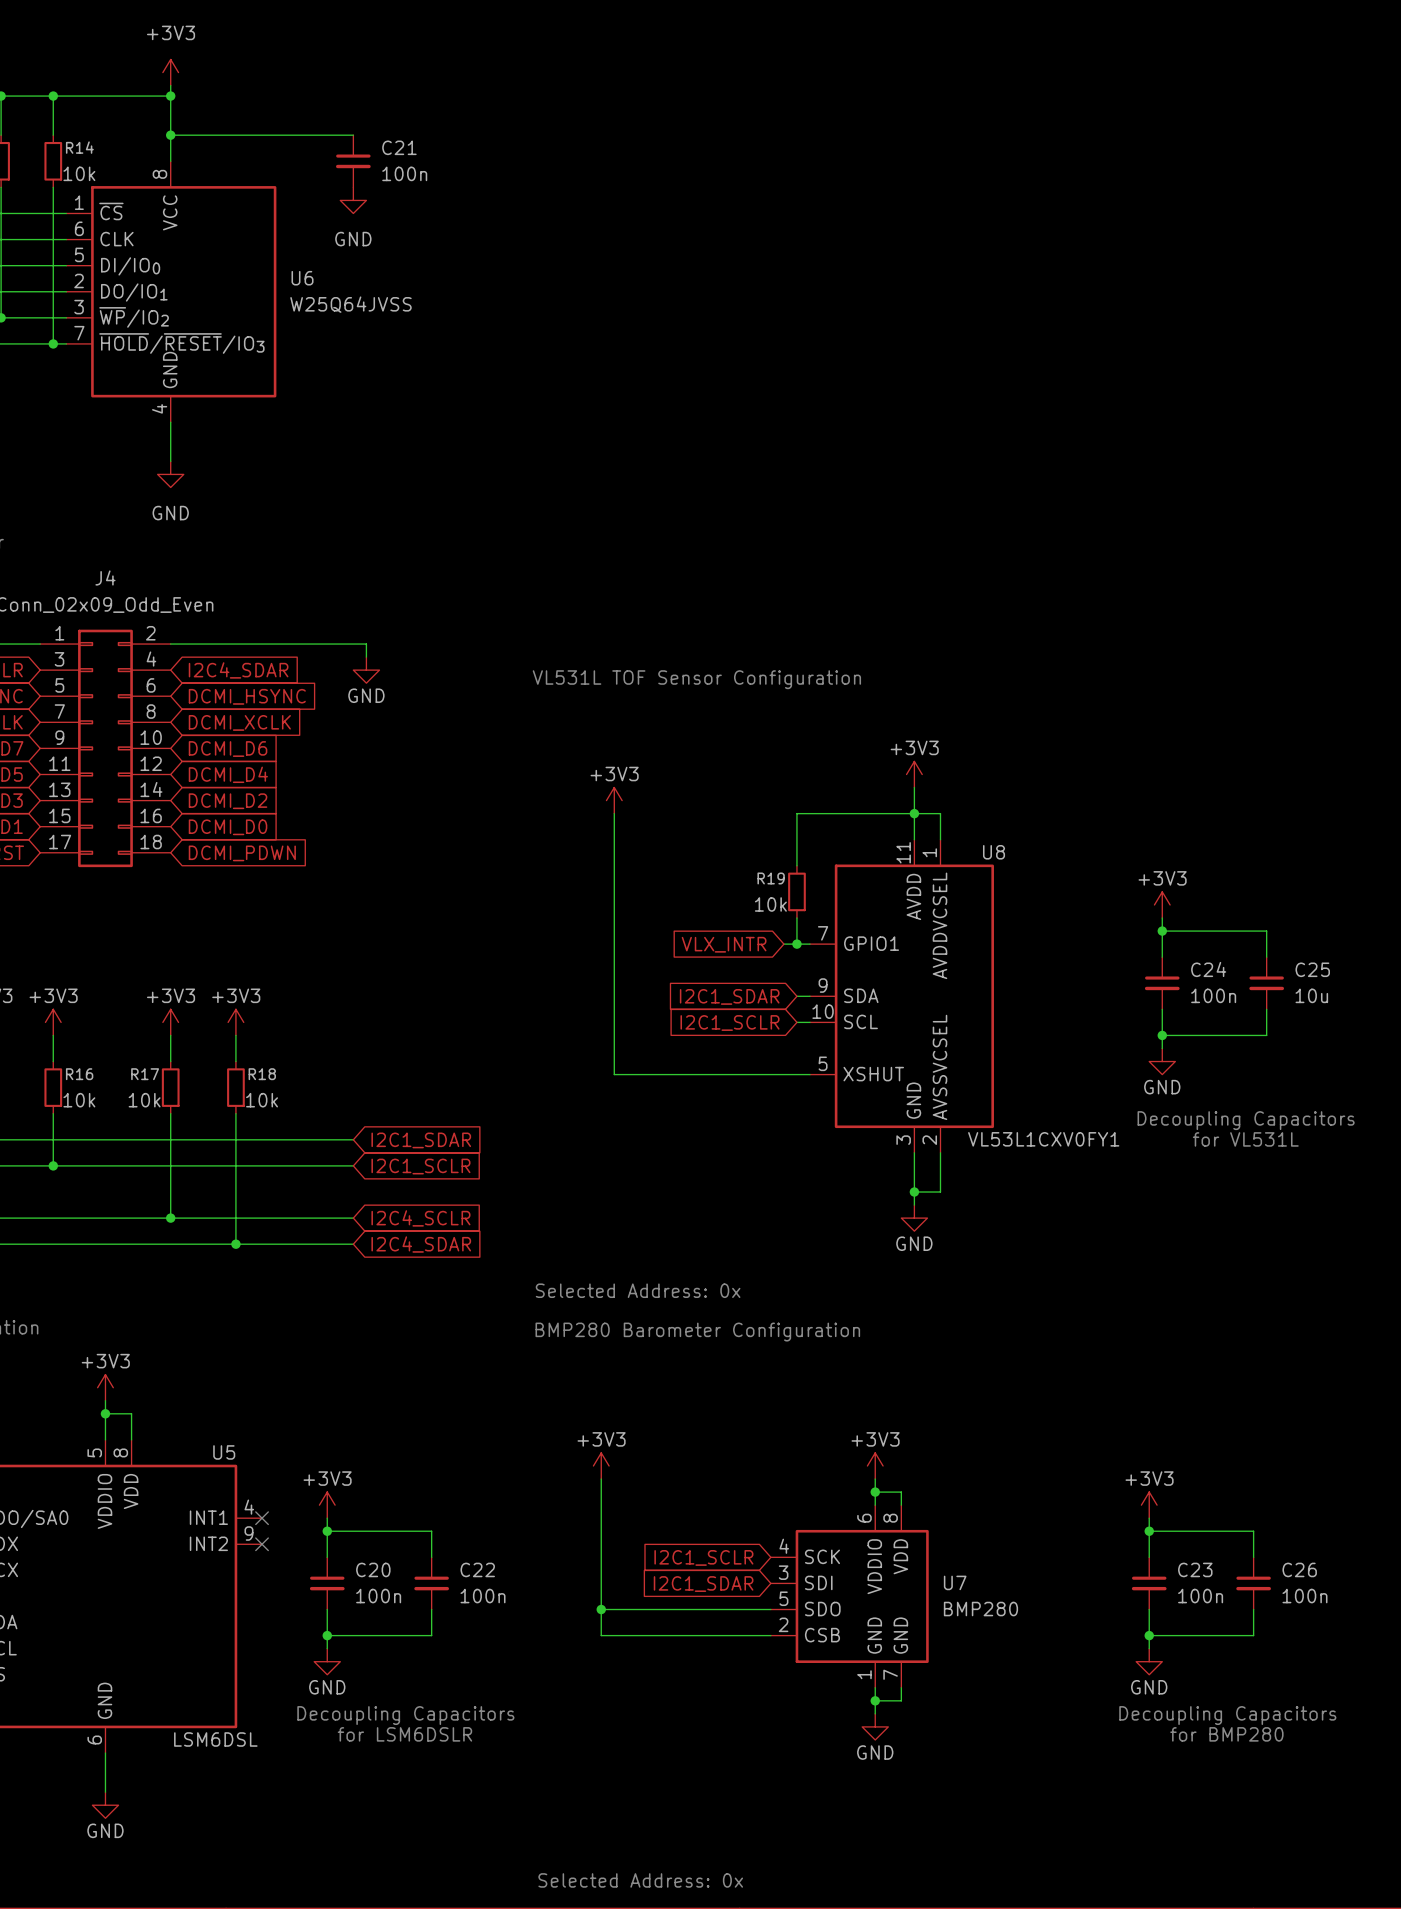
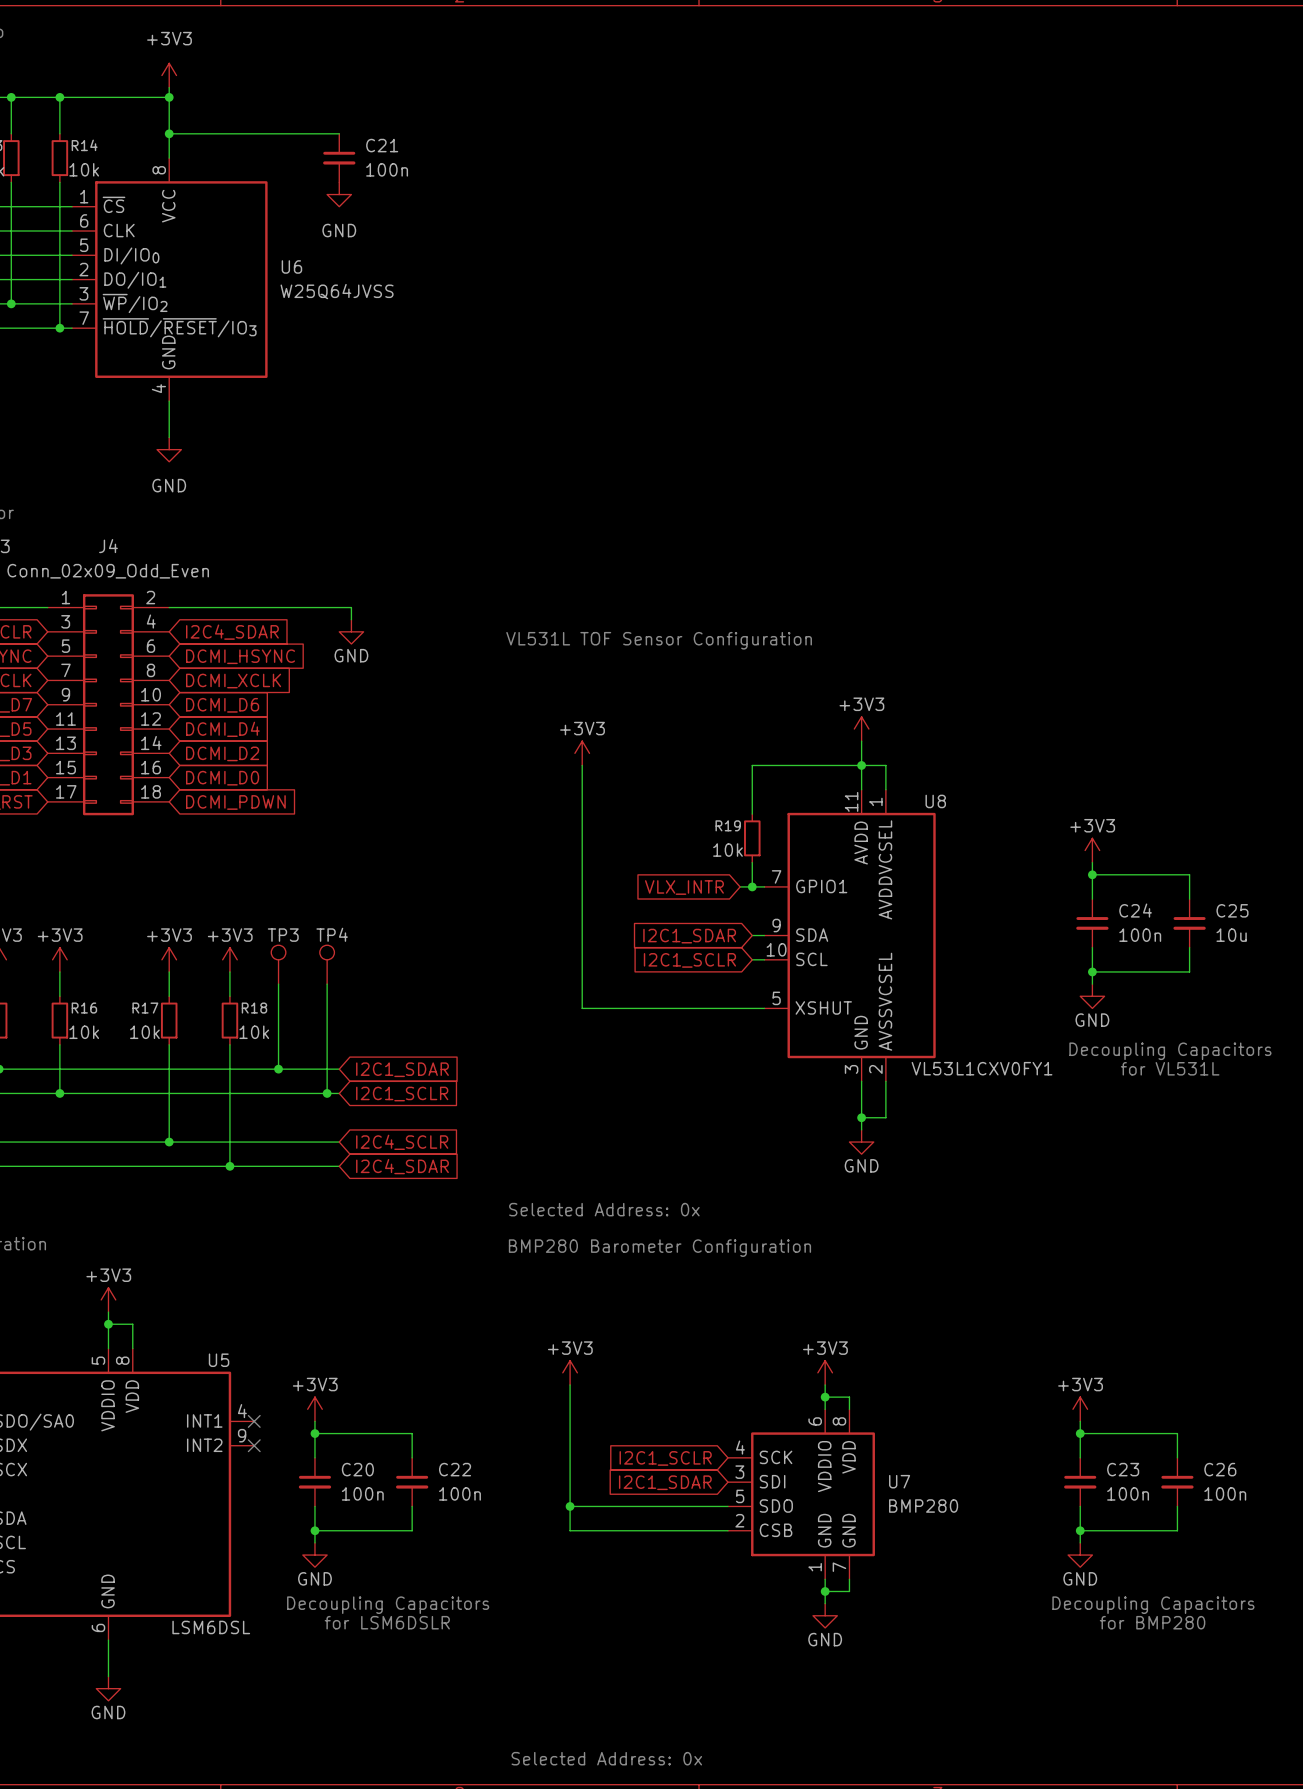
TP3: none -> (278, 964)
TP4: none -> (327, 964)
wire: none -> (278, 984) (278, 1069)
wire: none -> (327, 984) (327, 1093)
junction: none -> (278, 1069)
junction: none -> (327, 1093)

